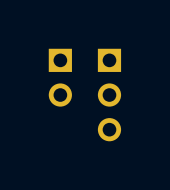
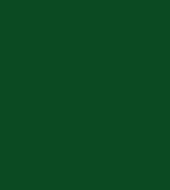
part: (60, 77) -> none
part: (109, 95) -> none

